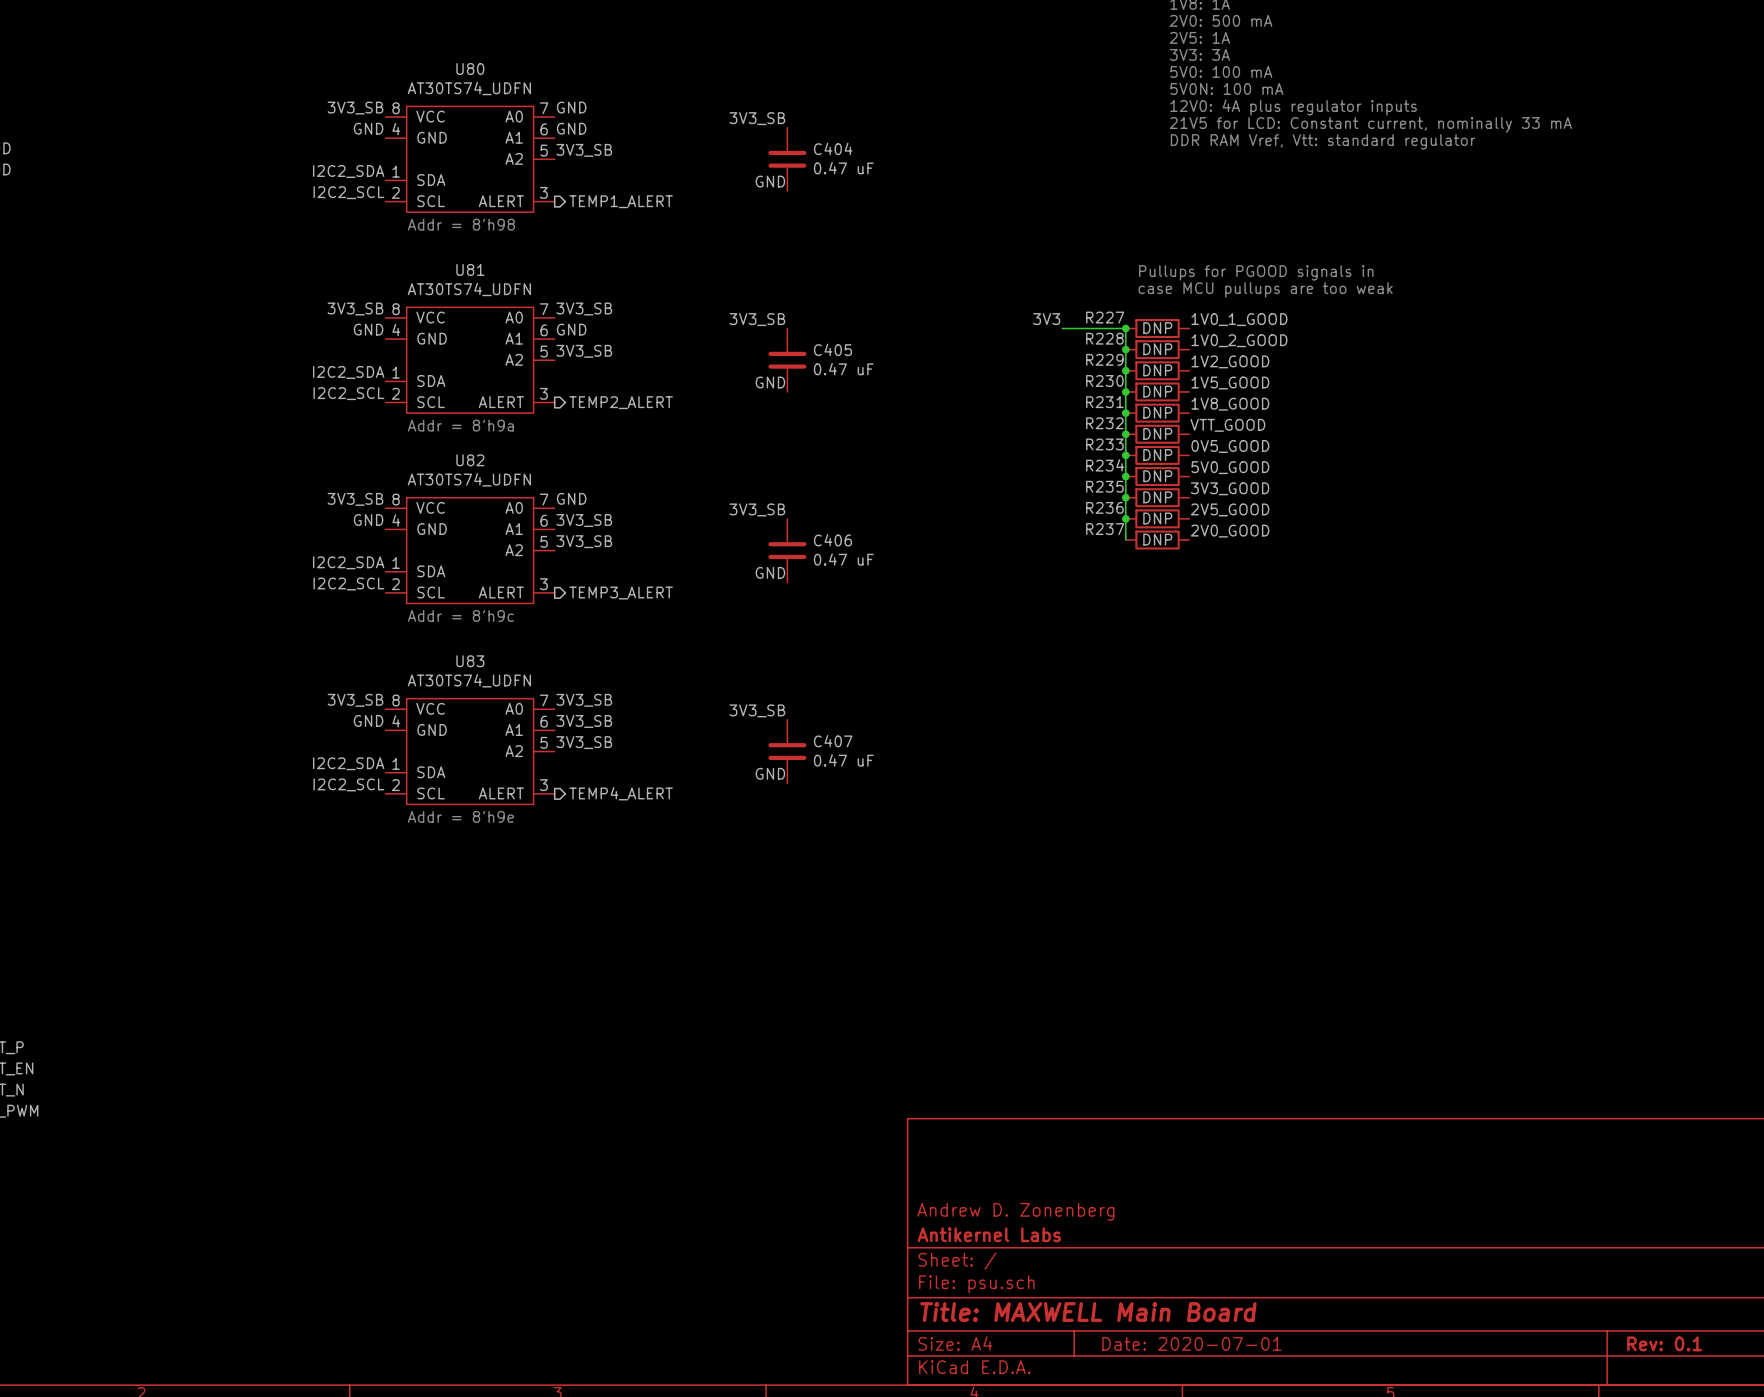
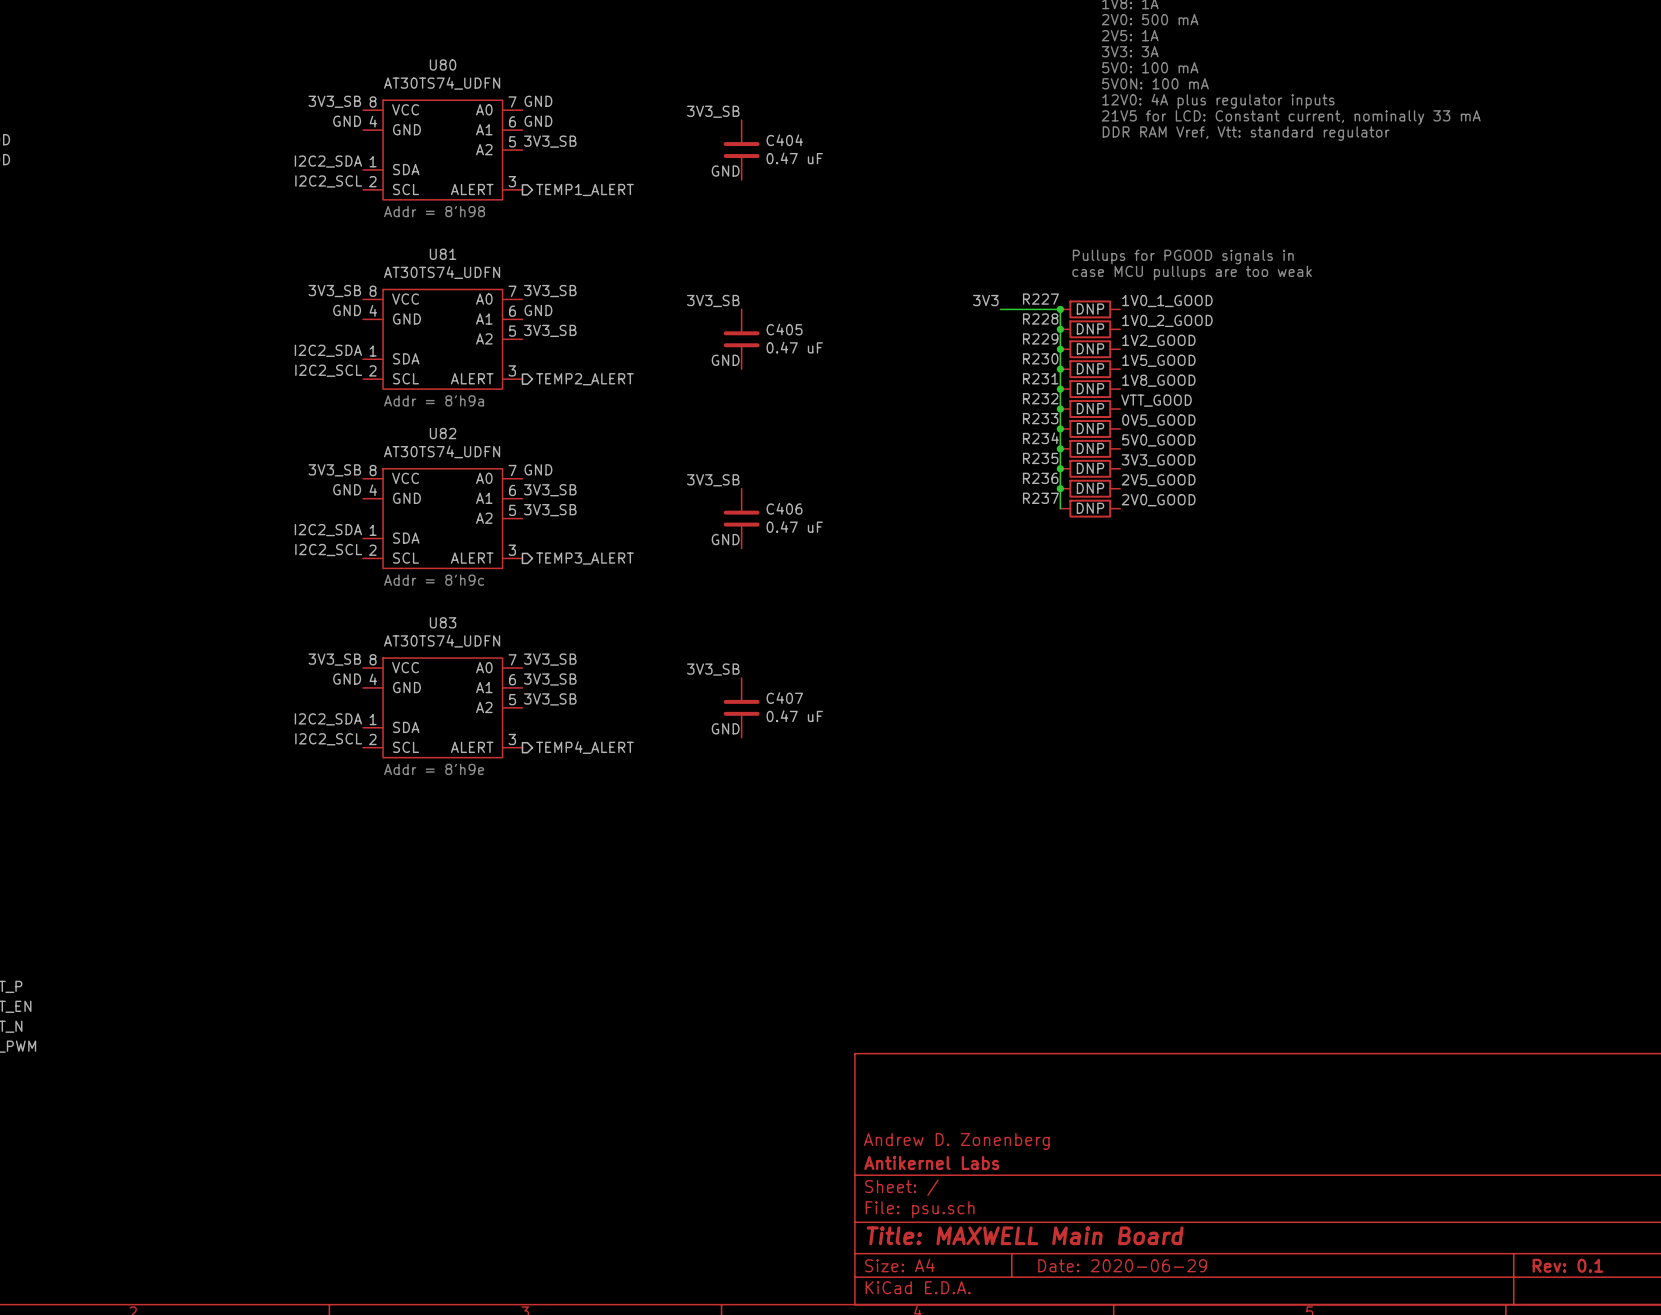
title block: Date: 2020-07-01 (1191, 1343) -> Date: 2020-06-29 (1122, 1265)

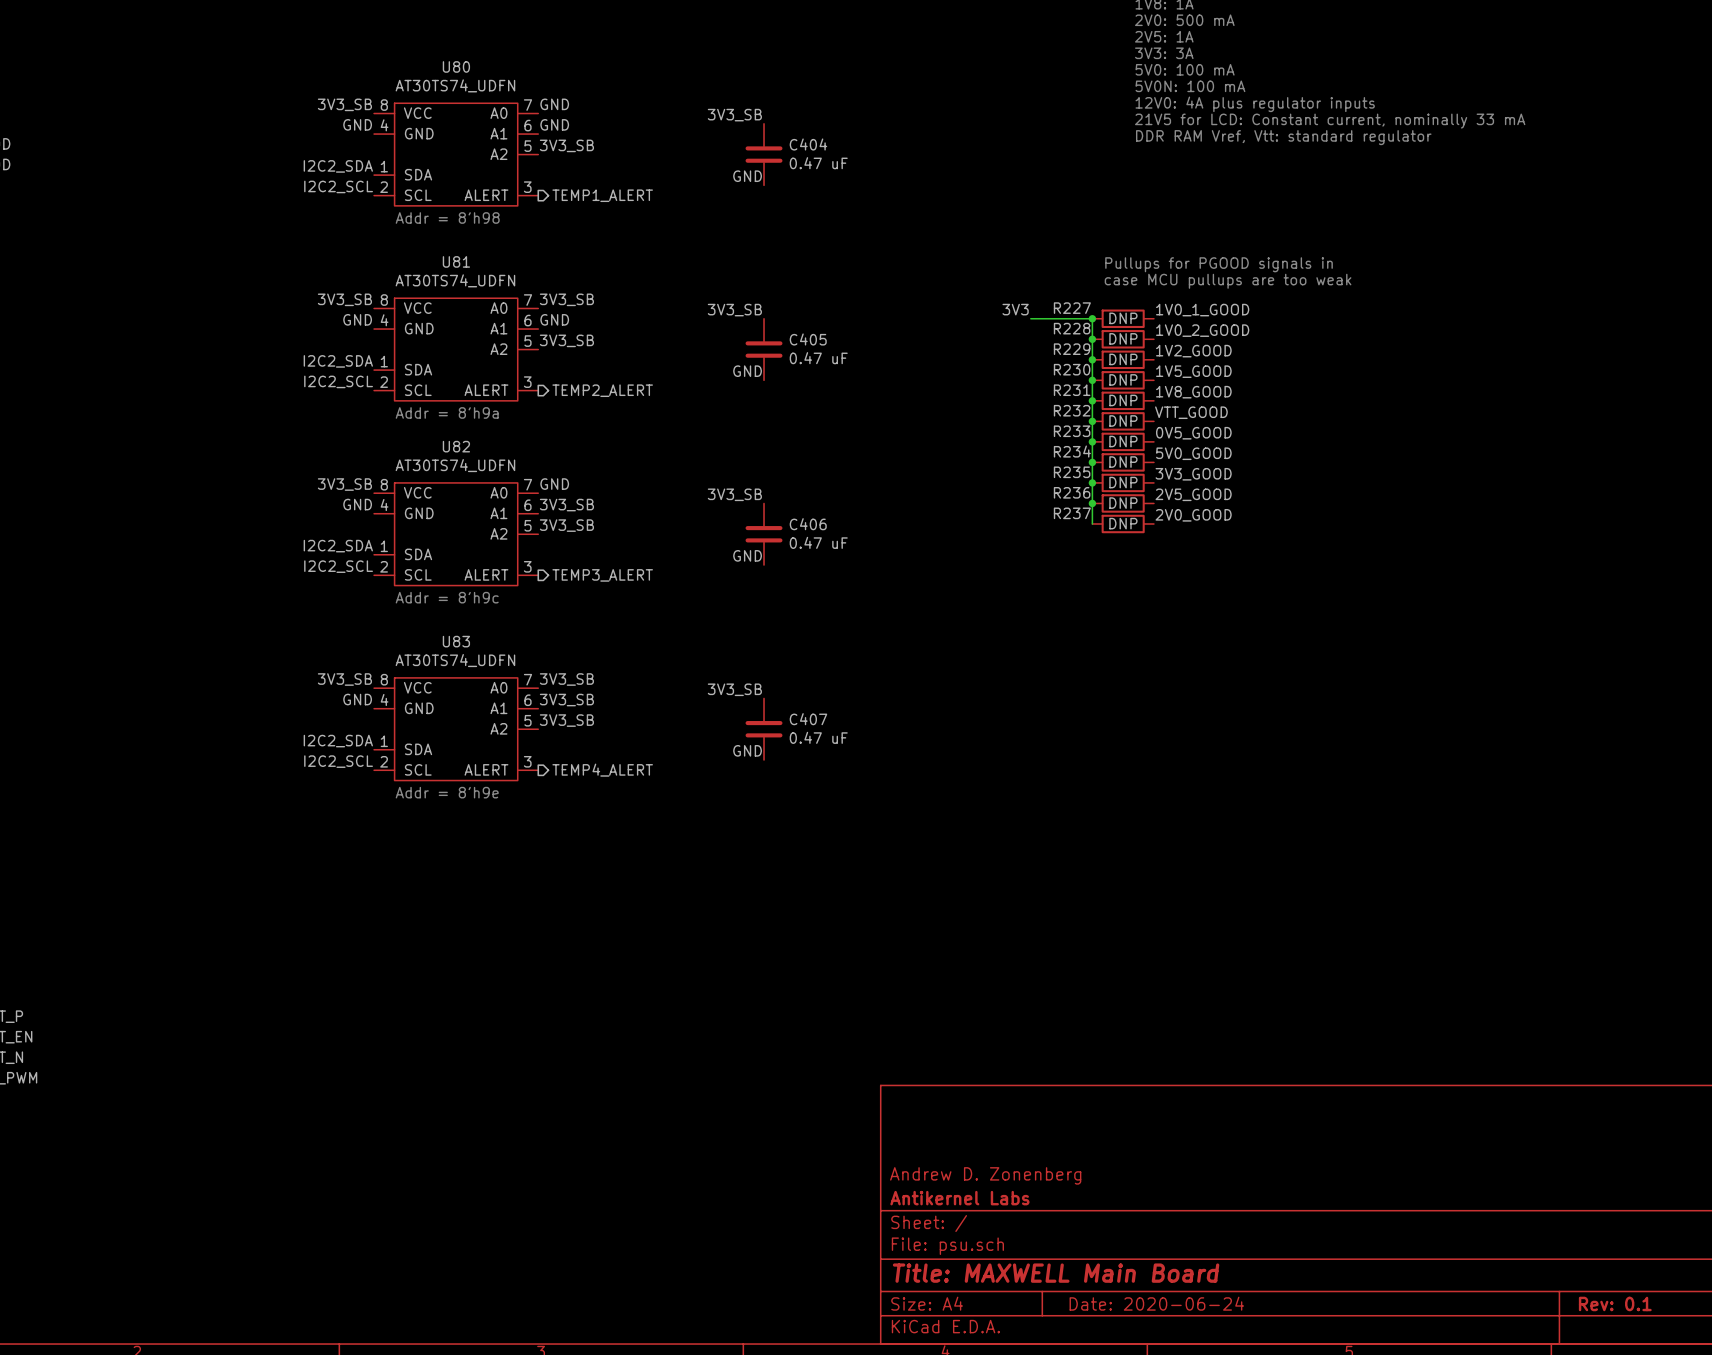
title block: Date: 2020-06-29 (1122, 1265) -> Date: 2020-06-24 (1156, 1303)

